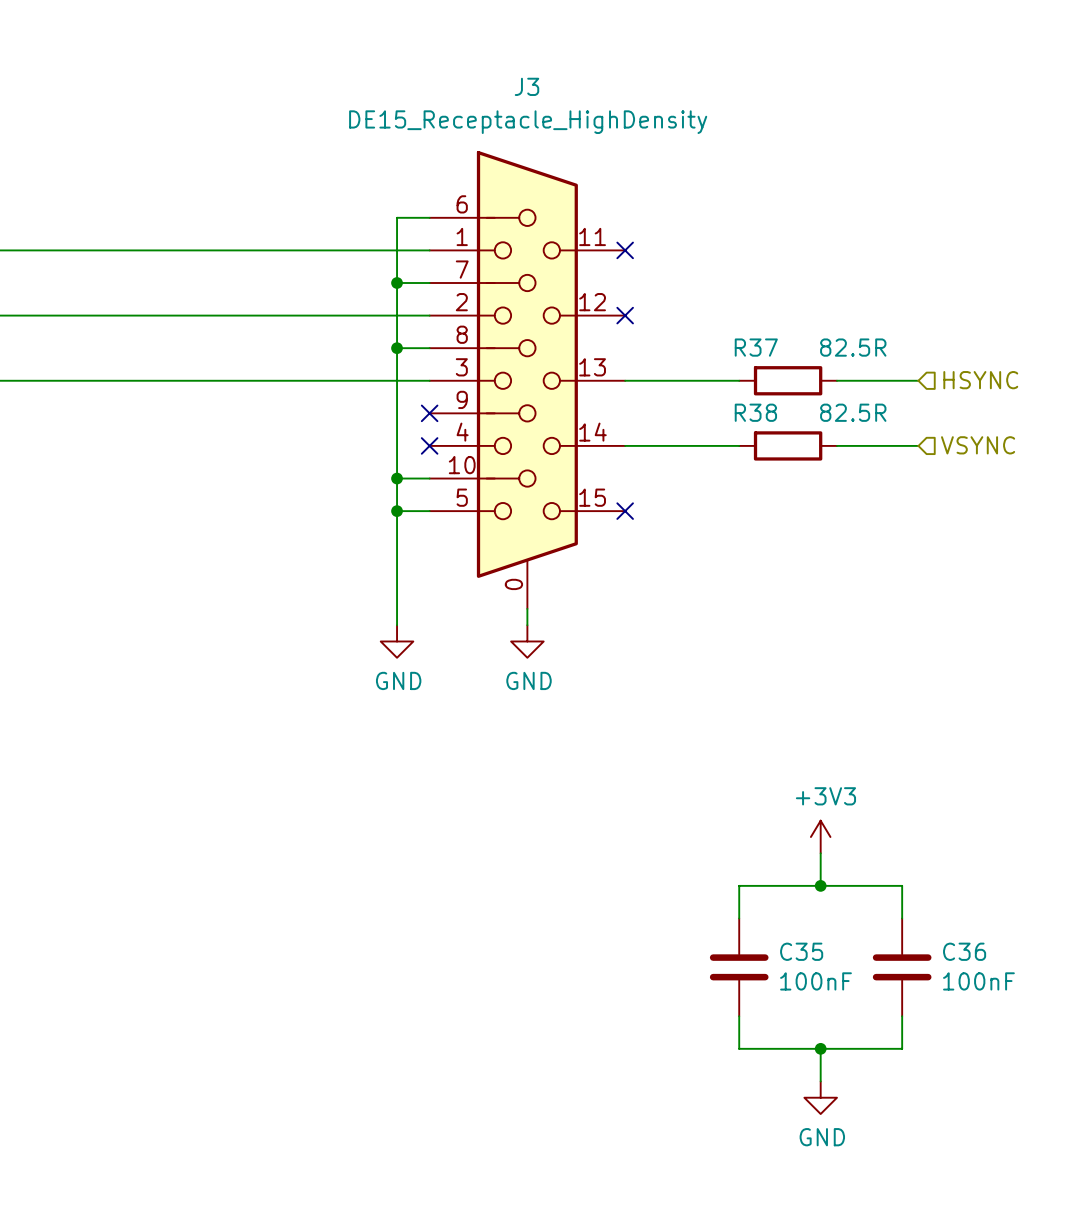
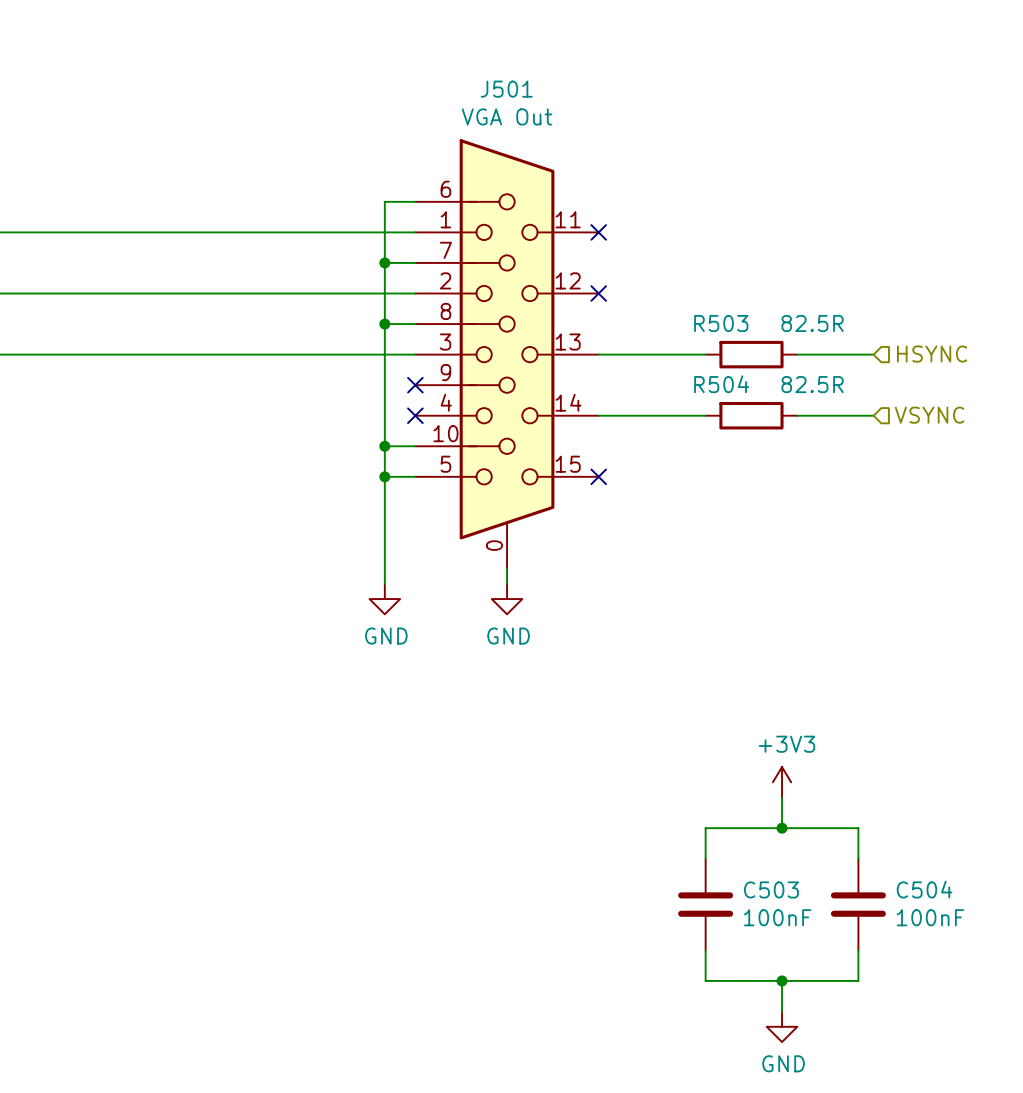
J3 name: J3 (527, 86) -> J501 (506, 89)
J3 value: DE15_Receptacle_HighDensity (528, 122) -> VGA Out (507, 116)
R37 name: R37 (756, 347) -> R503 (721, 323)
R38 name: R38 (755, 412) -> R504 (721, 384)
C35 name: C35 (801, 951) -> C503 (771, 889)
C36 name: C36 (964, 951) -> C504 (924, 889)

